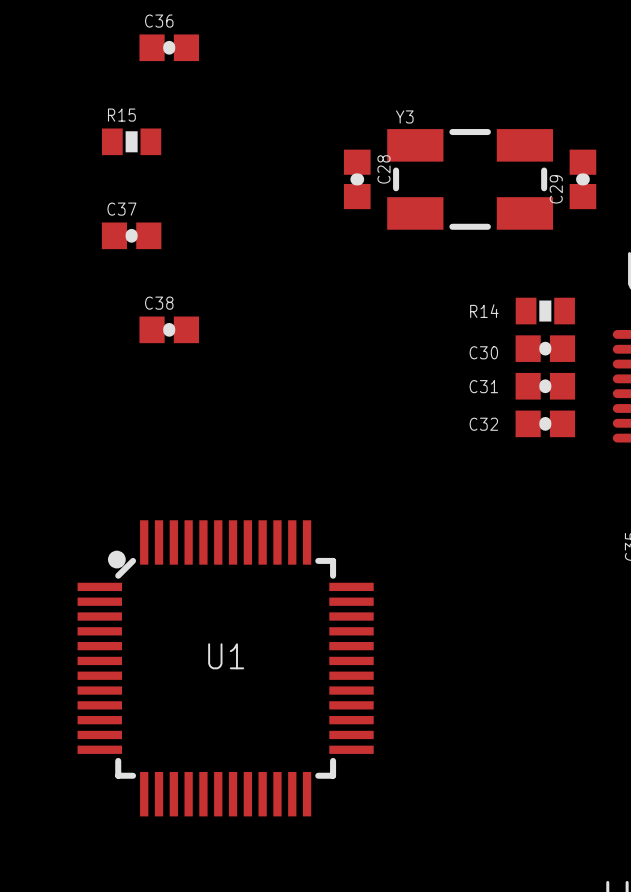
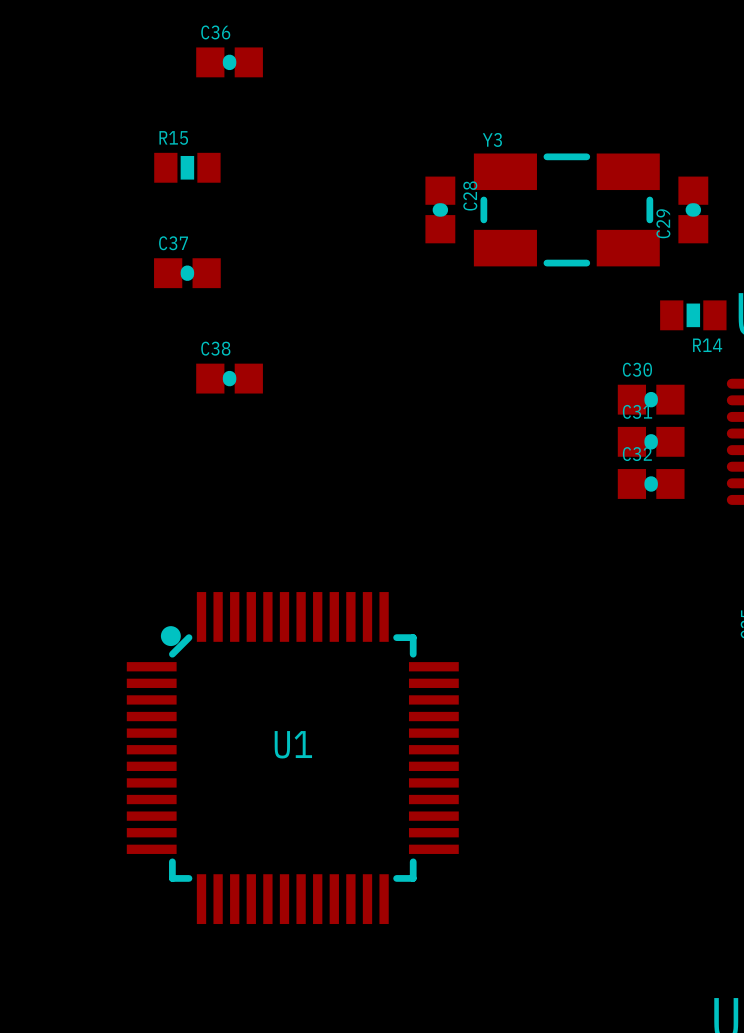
R14 name position: R14 (484, 311) -> R14 (707, 345)
R14 position: (545, 311) -> (693, 315)
C30 name position: C30 (483, 352) -> C30 (637, 369)
C31 name position: C31 (483, 386) -> C31 (637, 411)
C32 name position: C32 (483, 424) -> C32 (637, 454)

